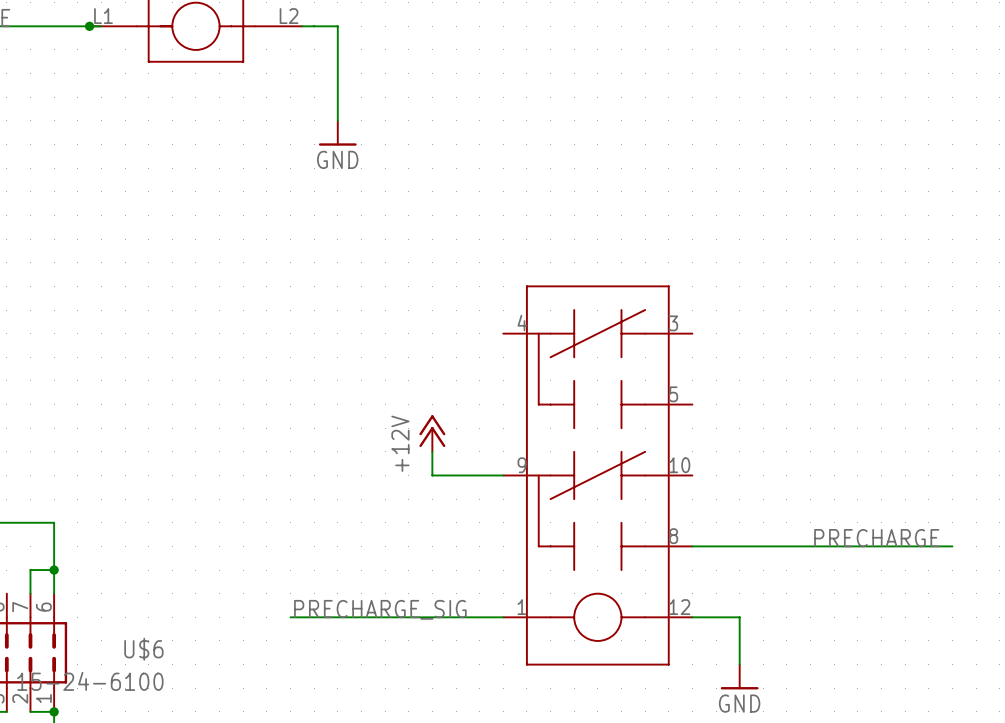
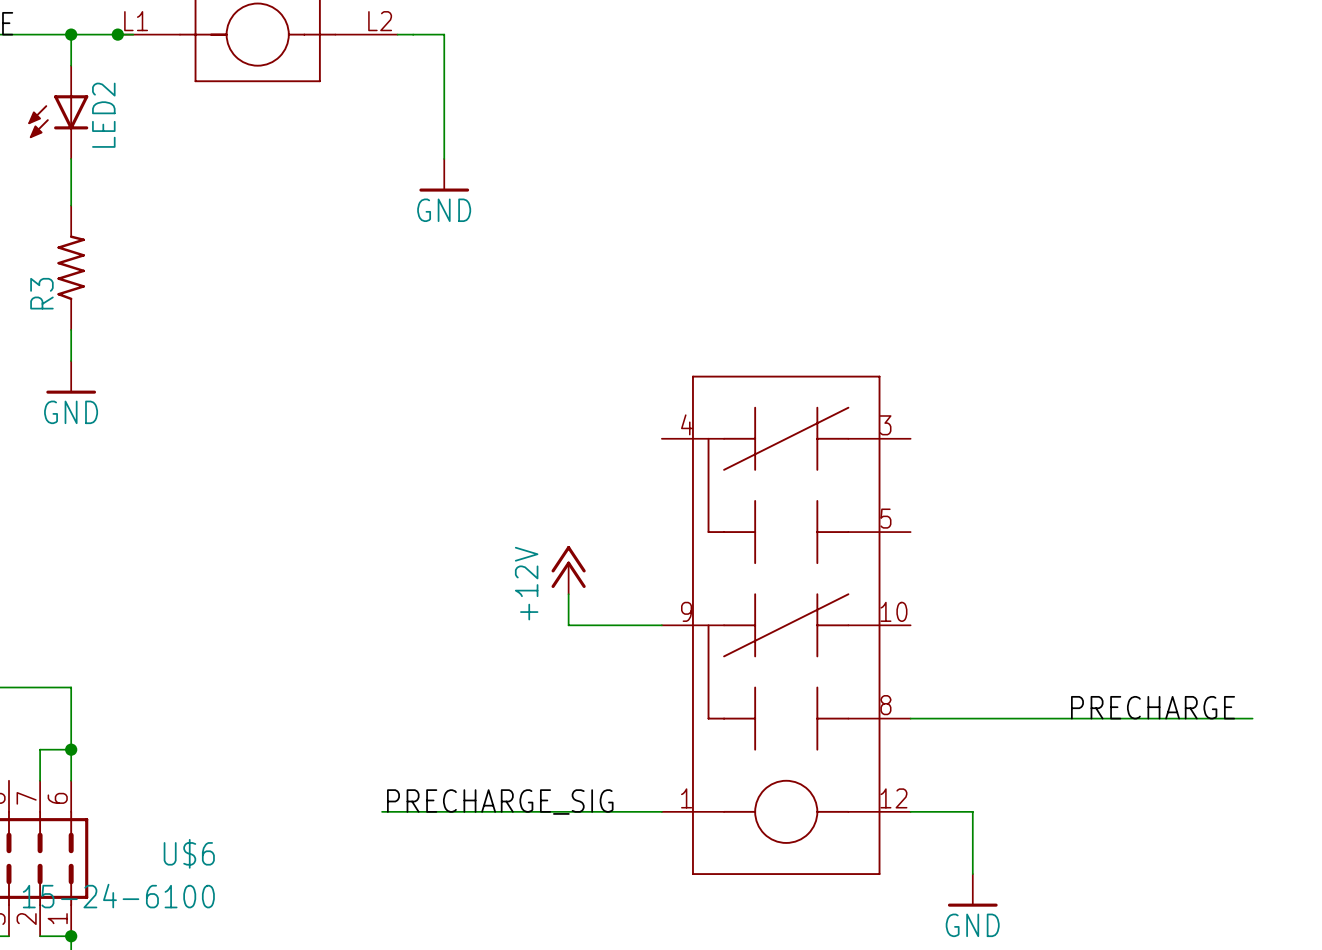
wire: none -> (71, 34) (71, 65)
junction: none -> (71, 34)
LED2: none -> (58, 112)
wire: none -> (71, 158) (71, 205)
R3: none -> (71, 267)
wire: none -> (71, 329) (71, 361)
power symbol: none -> GND (71, 377)

